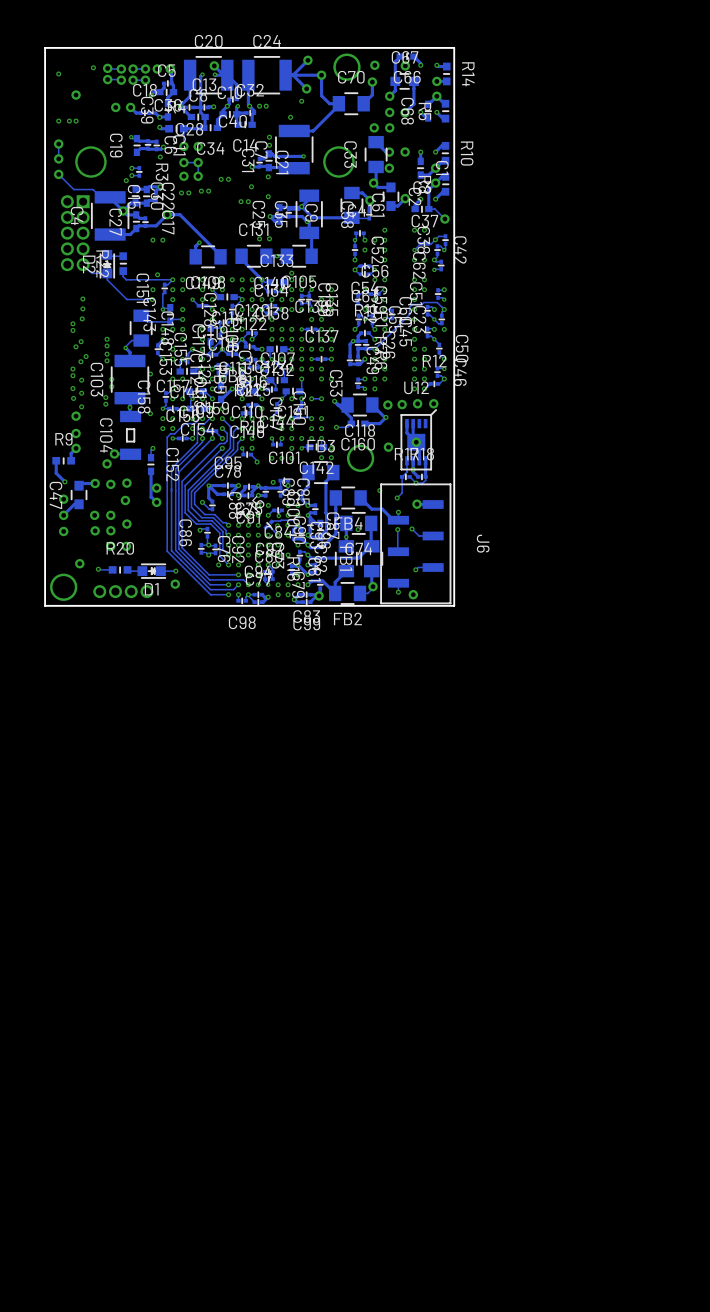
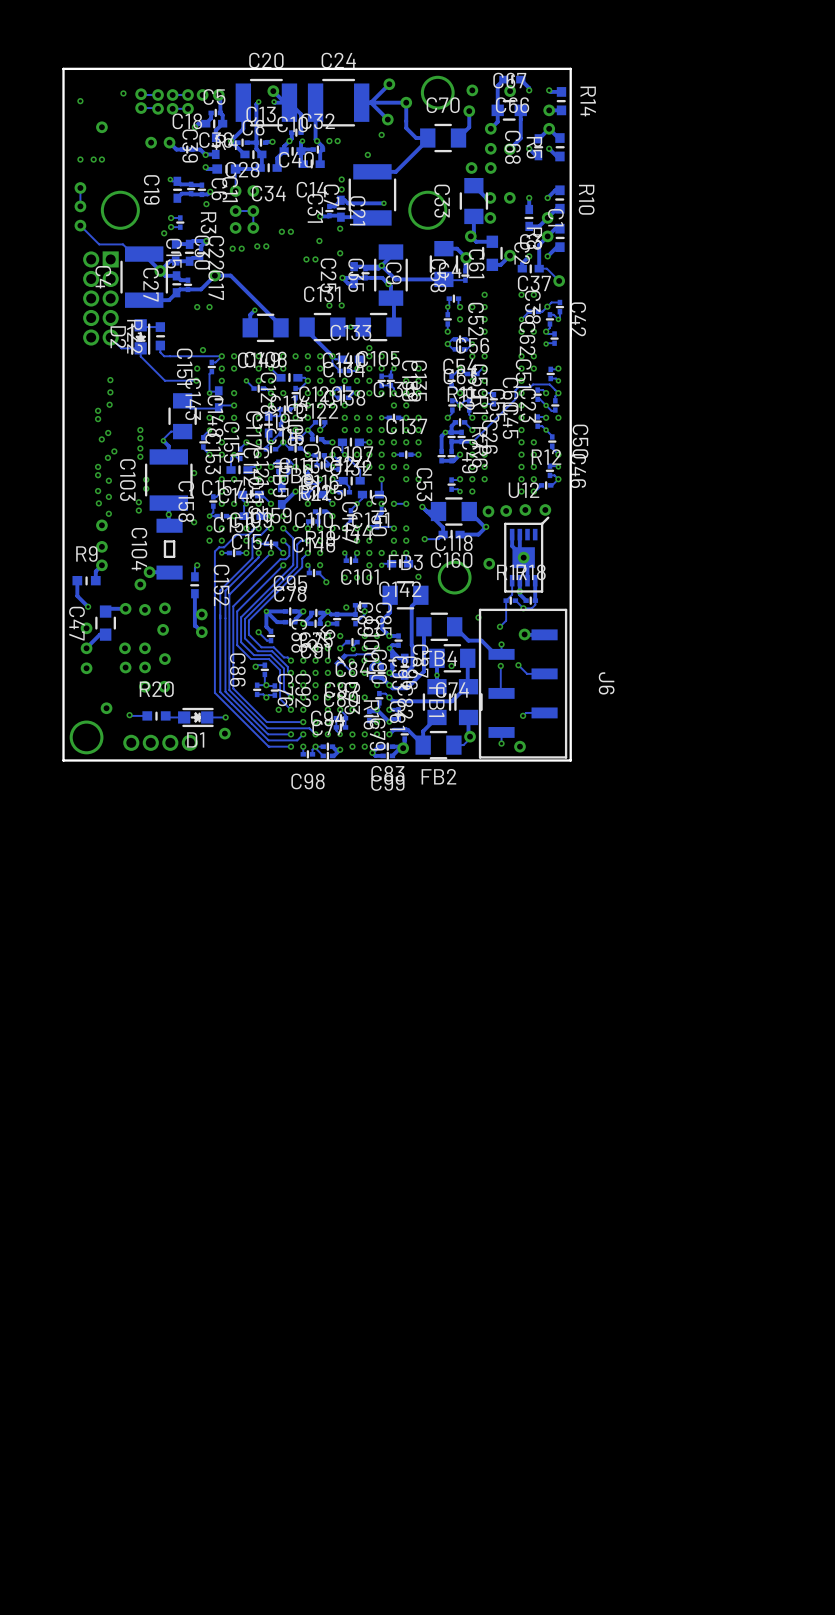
via: (331, 448) -> none
via: (321, 457) -> none

